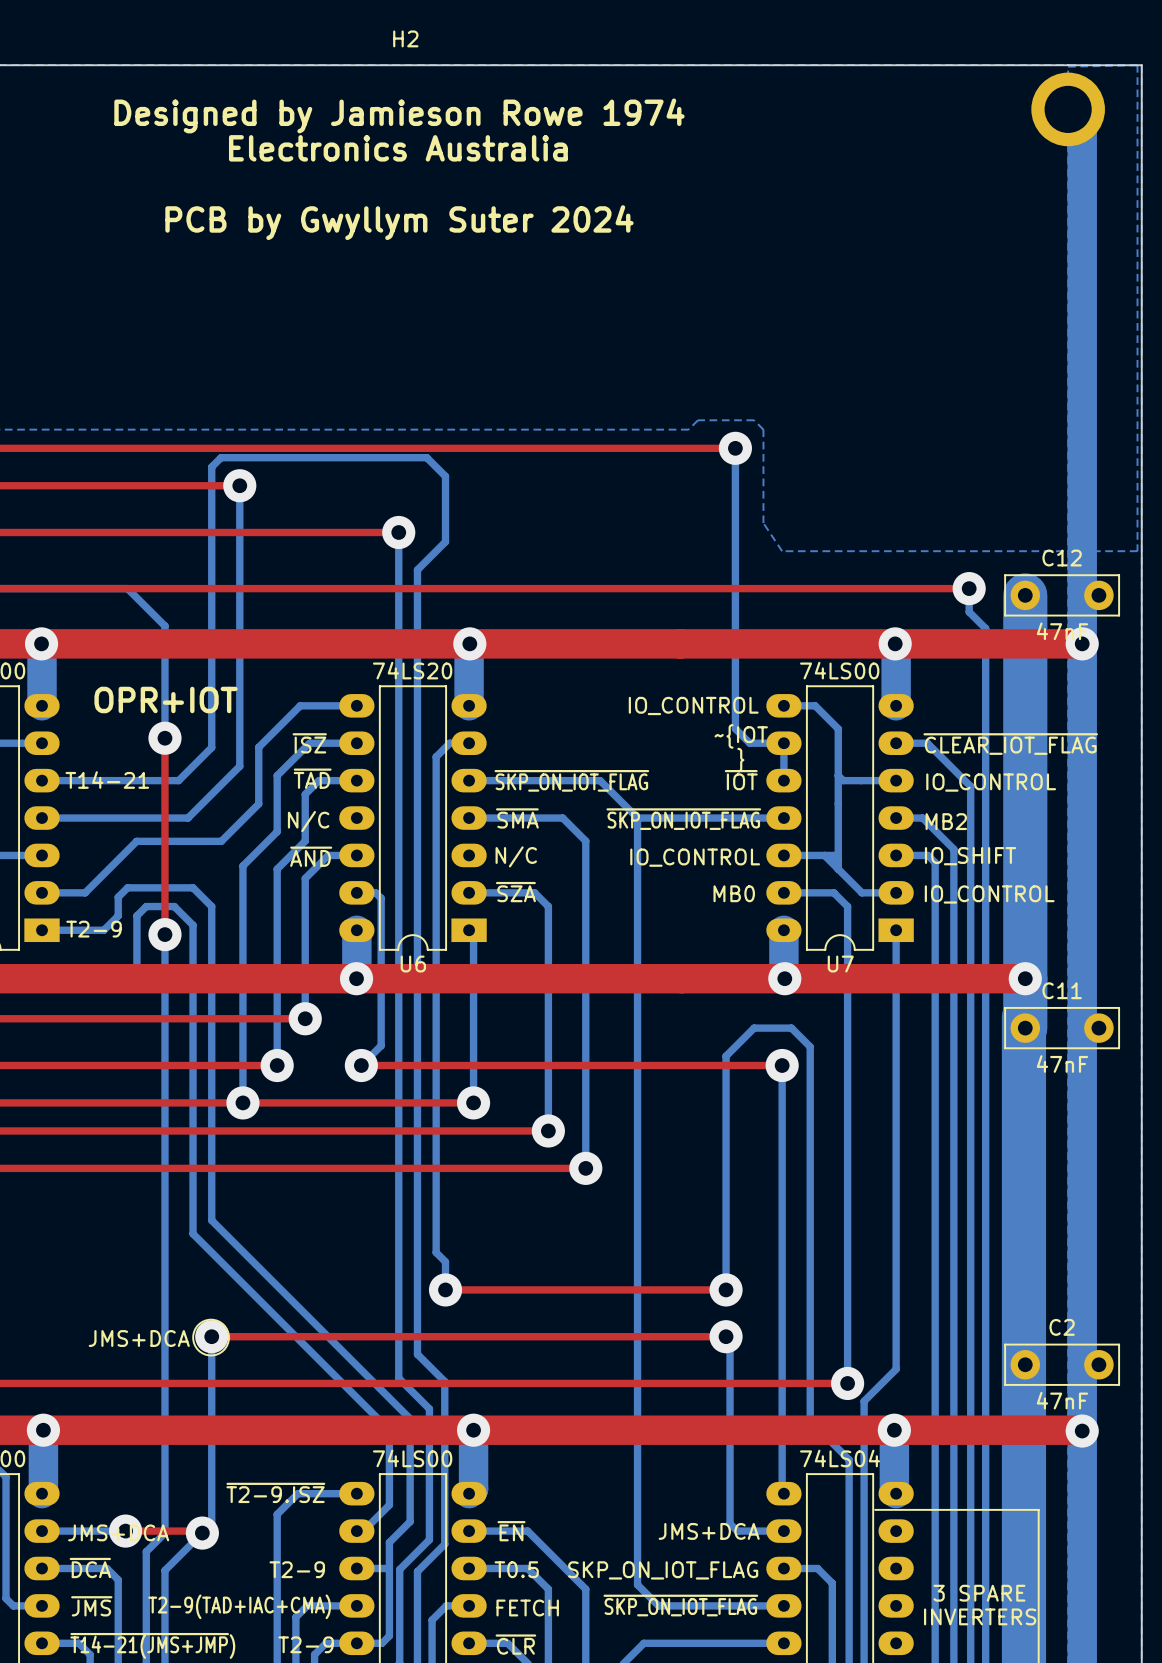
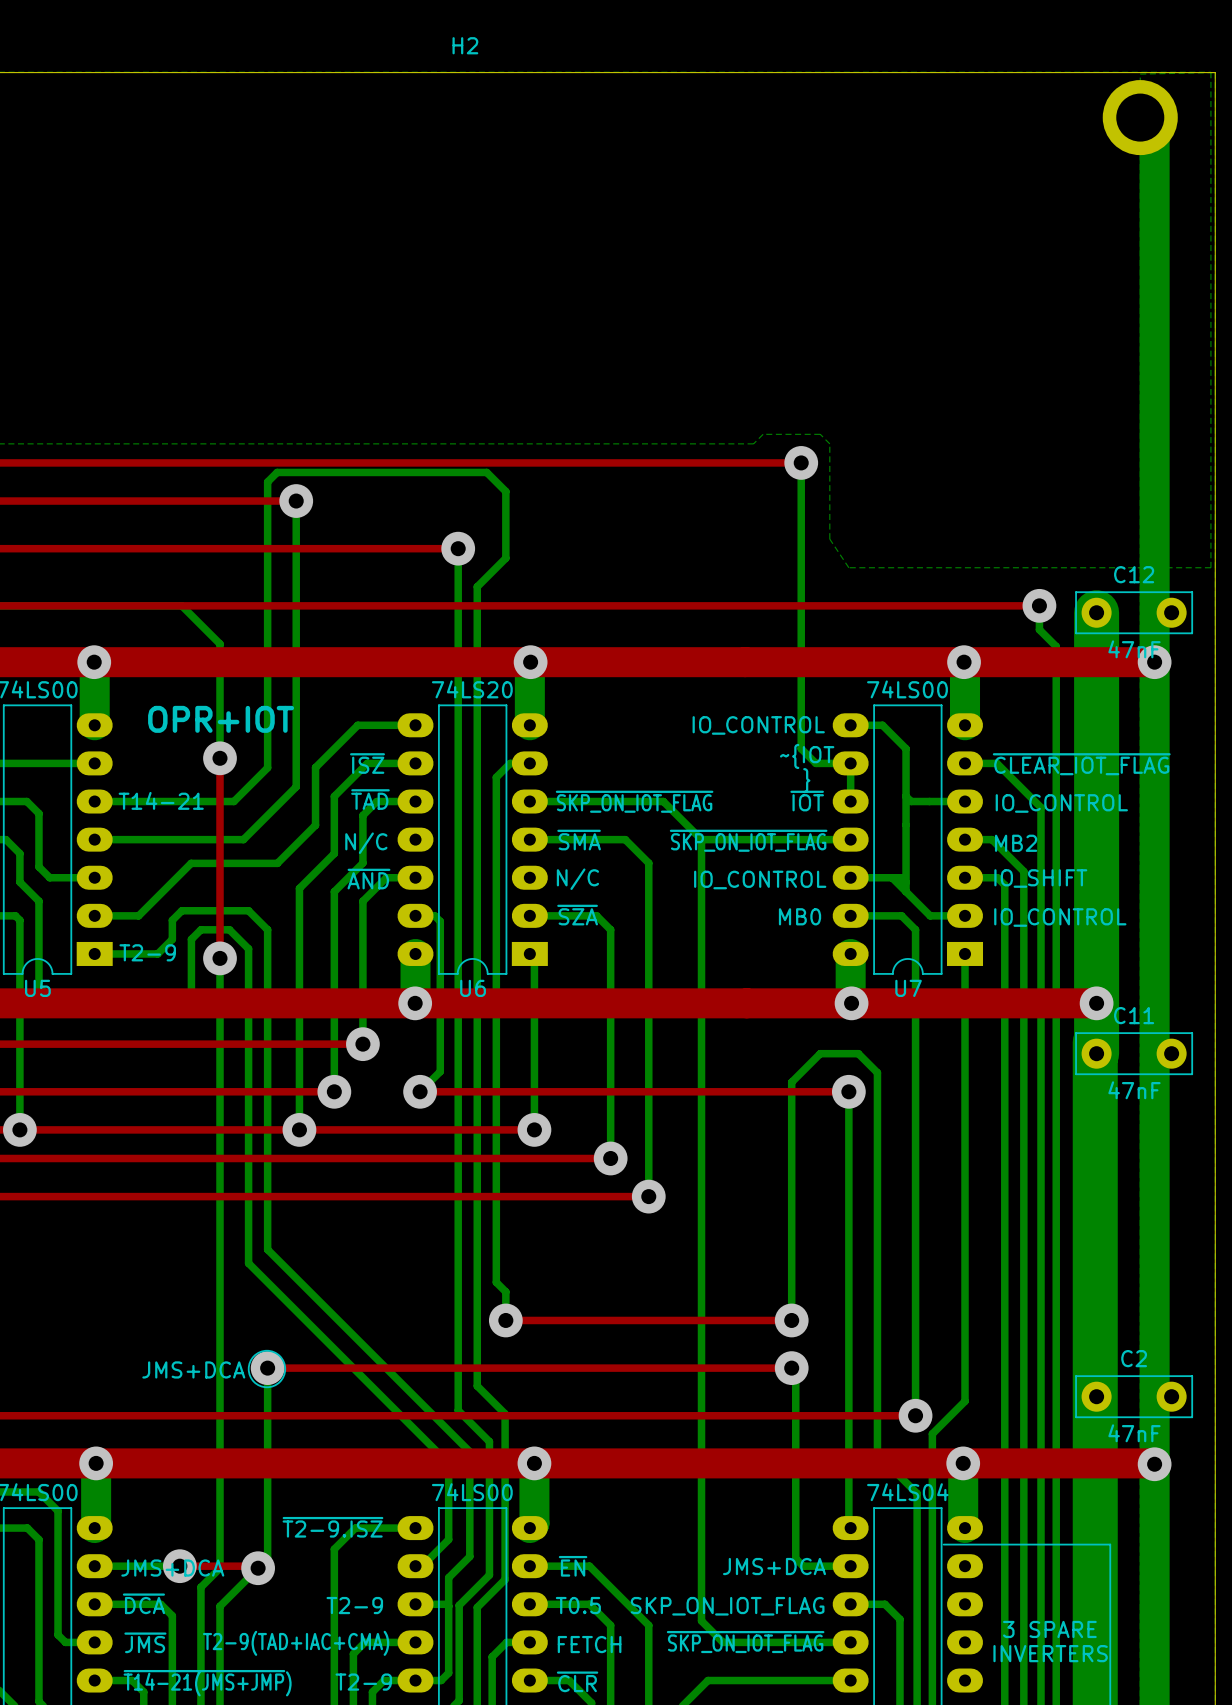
text: Designed by Jamieson Rowe 1974 (399, 115) -> none
text: Electronics Australia (398, 148) -> none
text: PCB by Gwyllym Suter 2024 (399, 222) -> none

